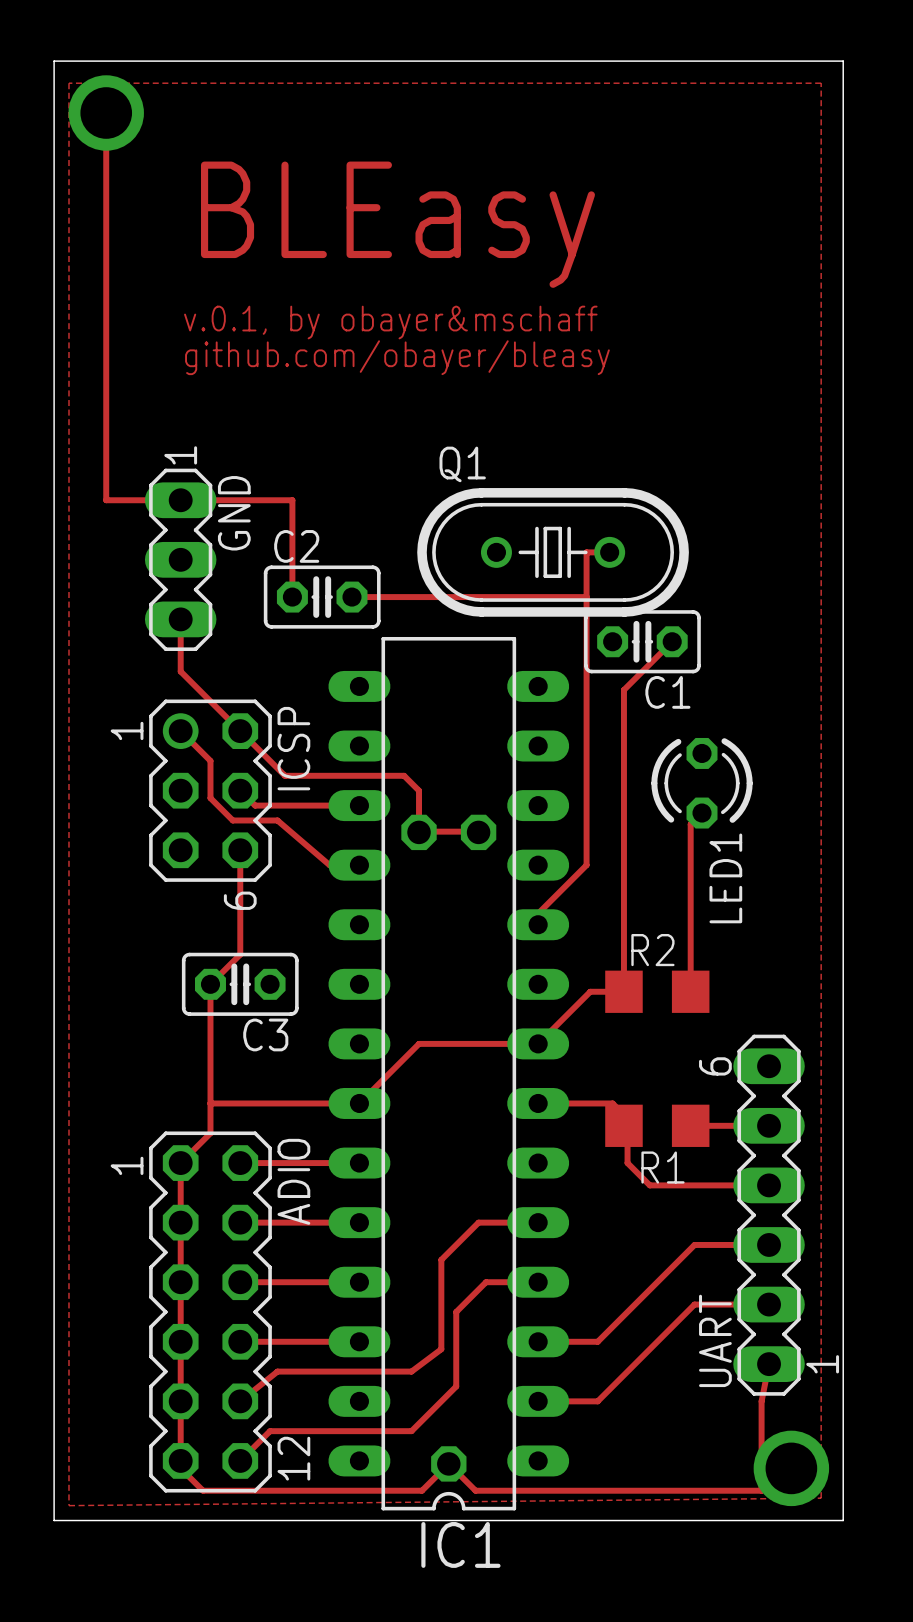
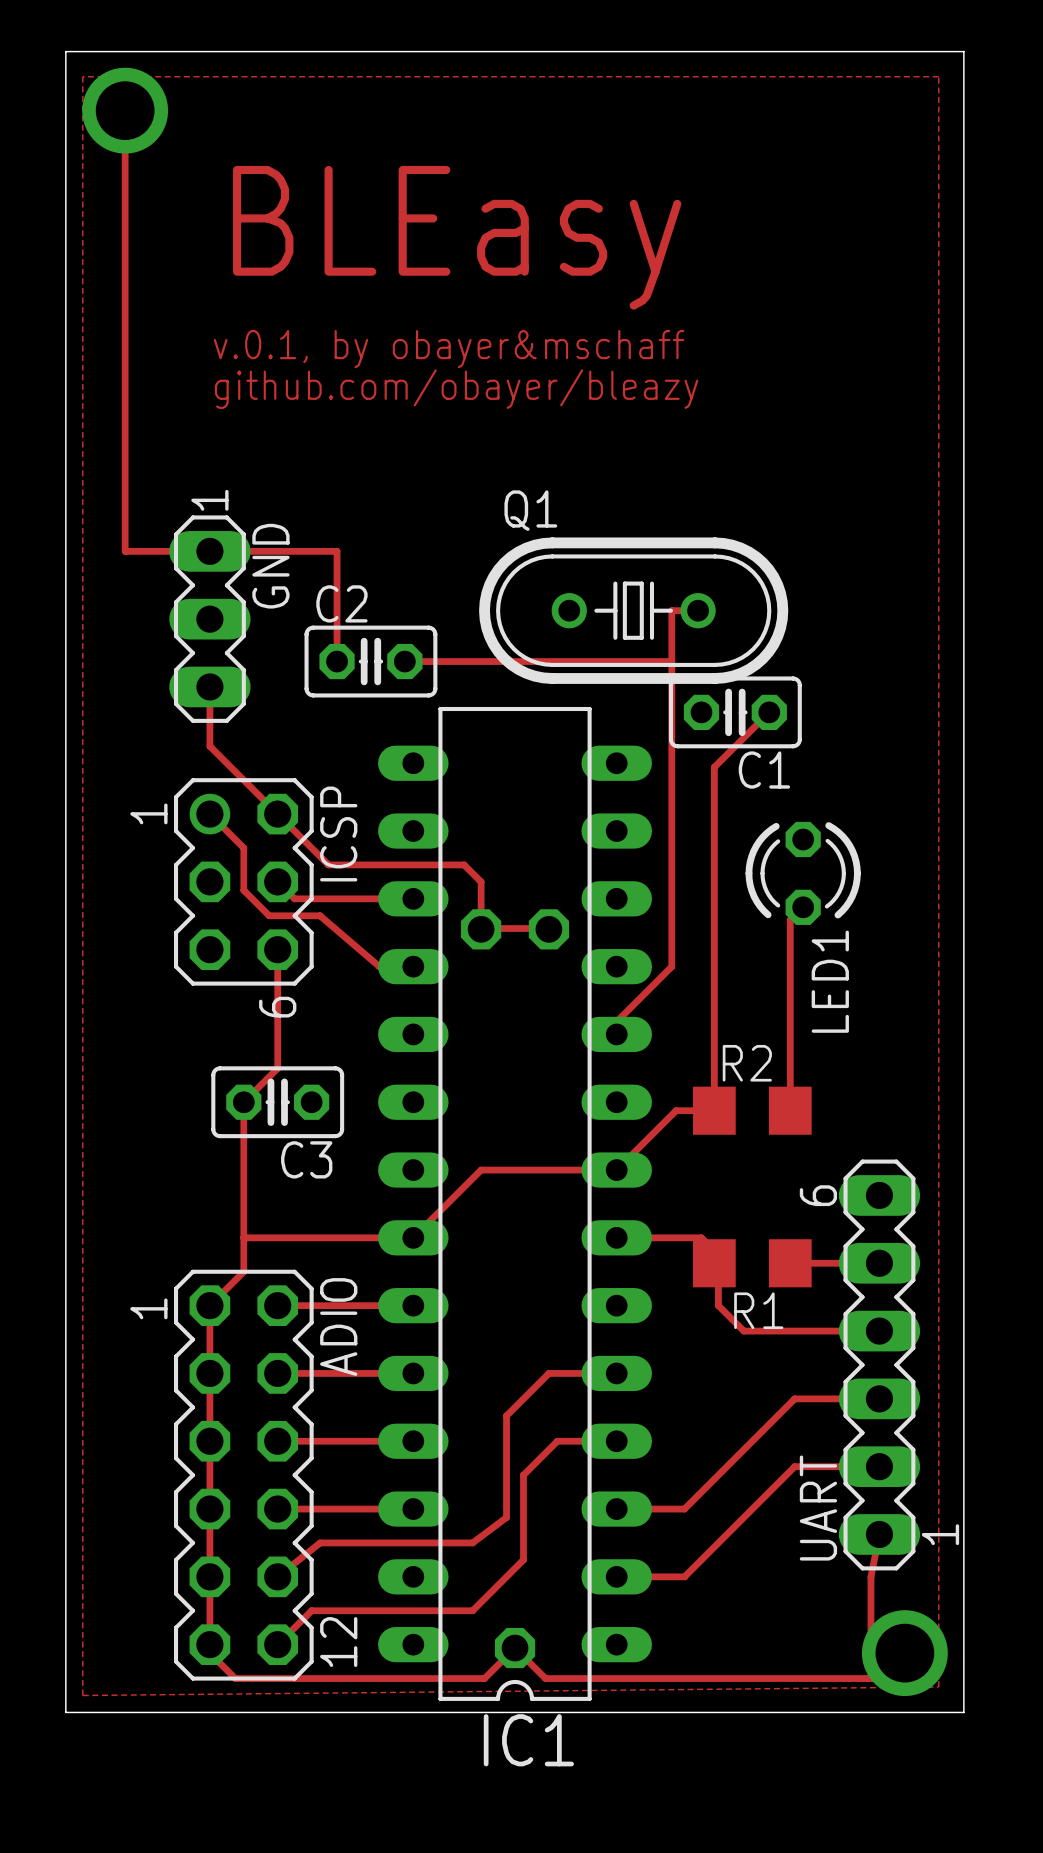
text: github.com/obayer/bleasy (397, 357) -> github.com/obayer/bleazy (456, 389)

